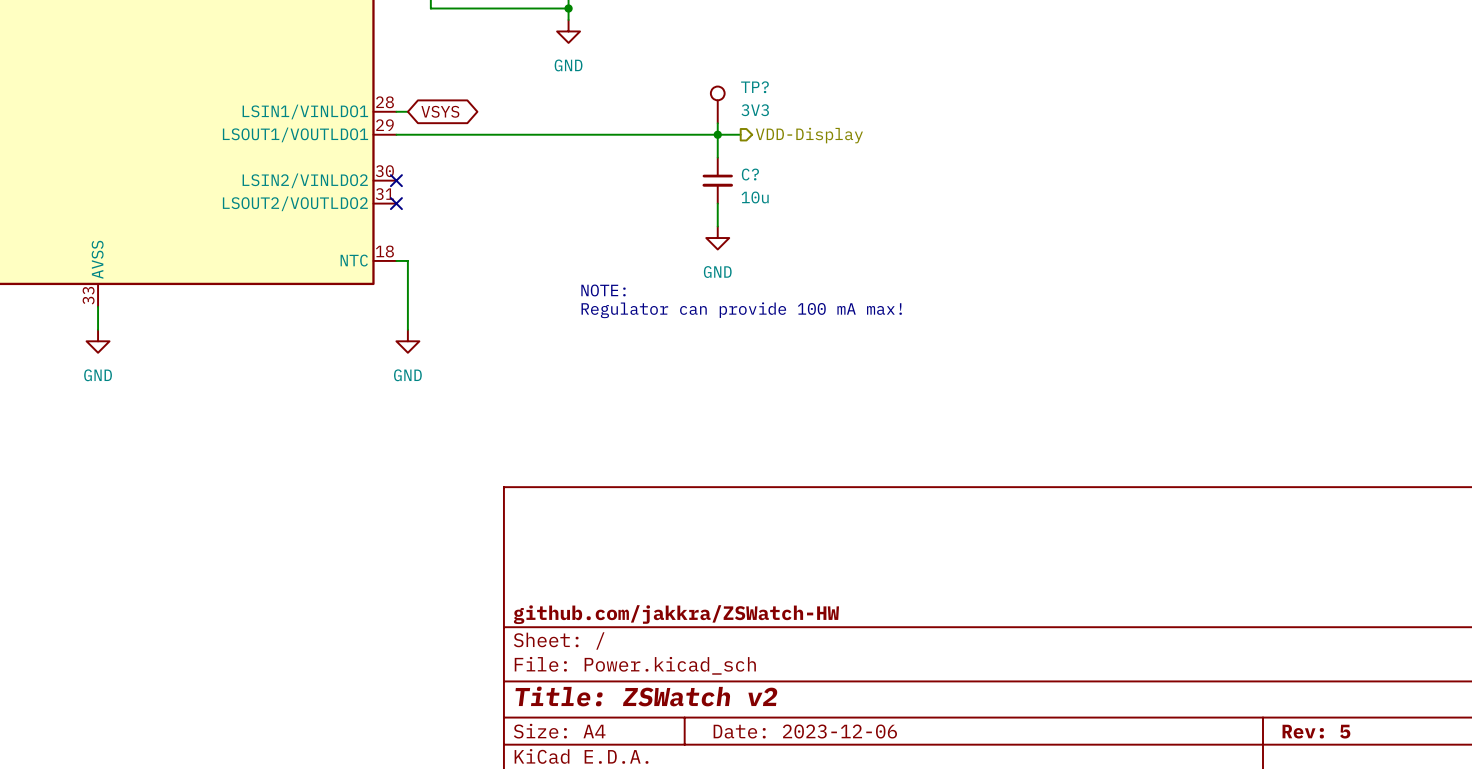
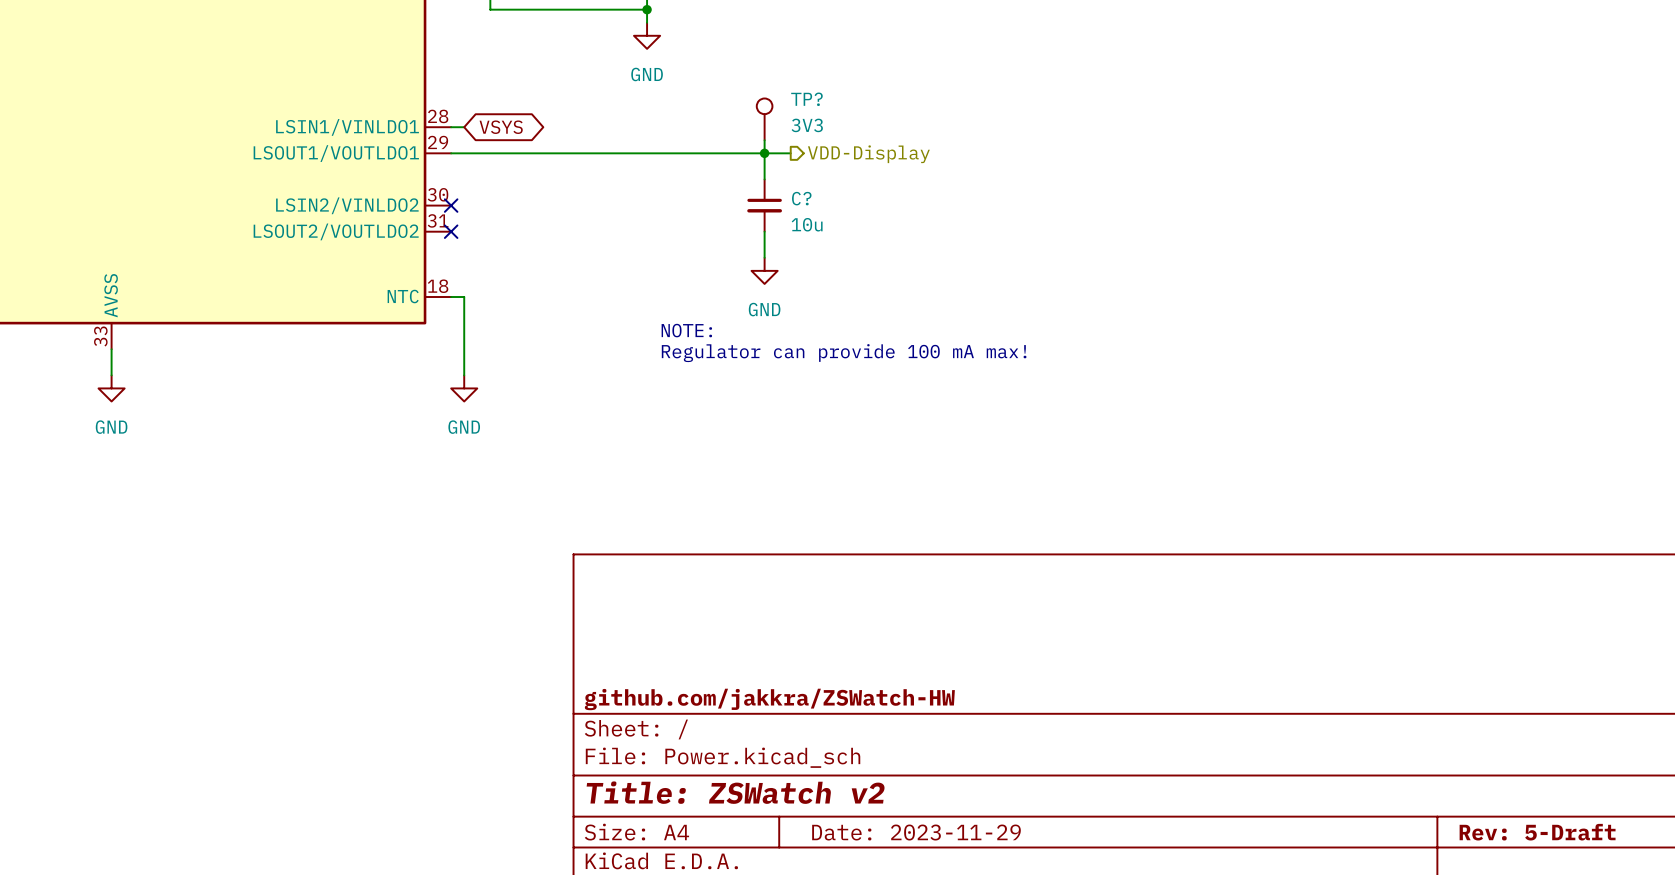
TP? position: (717, 104) -> (764, 119)
wire: (717, 123) (717, 157) -> (764, 140) (764, 179)
wire: (694, 134) (740, 134) -> none
junction position: (717, 134) -> (764, 153)
hierarchical label position: VDD-Display (809, 135) -> VDD-Display (868, 154)
C? position: (717, 180) -> (764, 205)
wire: (717, 203) (717, 226) -> (764, 231) (764, 257)
power symbol position: GND (717, 238) -> GND (764, 270)
title block: Date: 2023-12-06 (805, 731) -> Date: 2023-11-29 (916, 832)
title block: Rev: 5 (1316, 731) -> Rev: 5-Draft (1537, 832)

